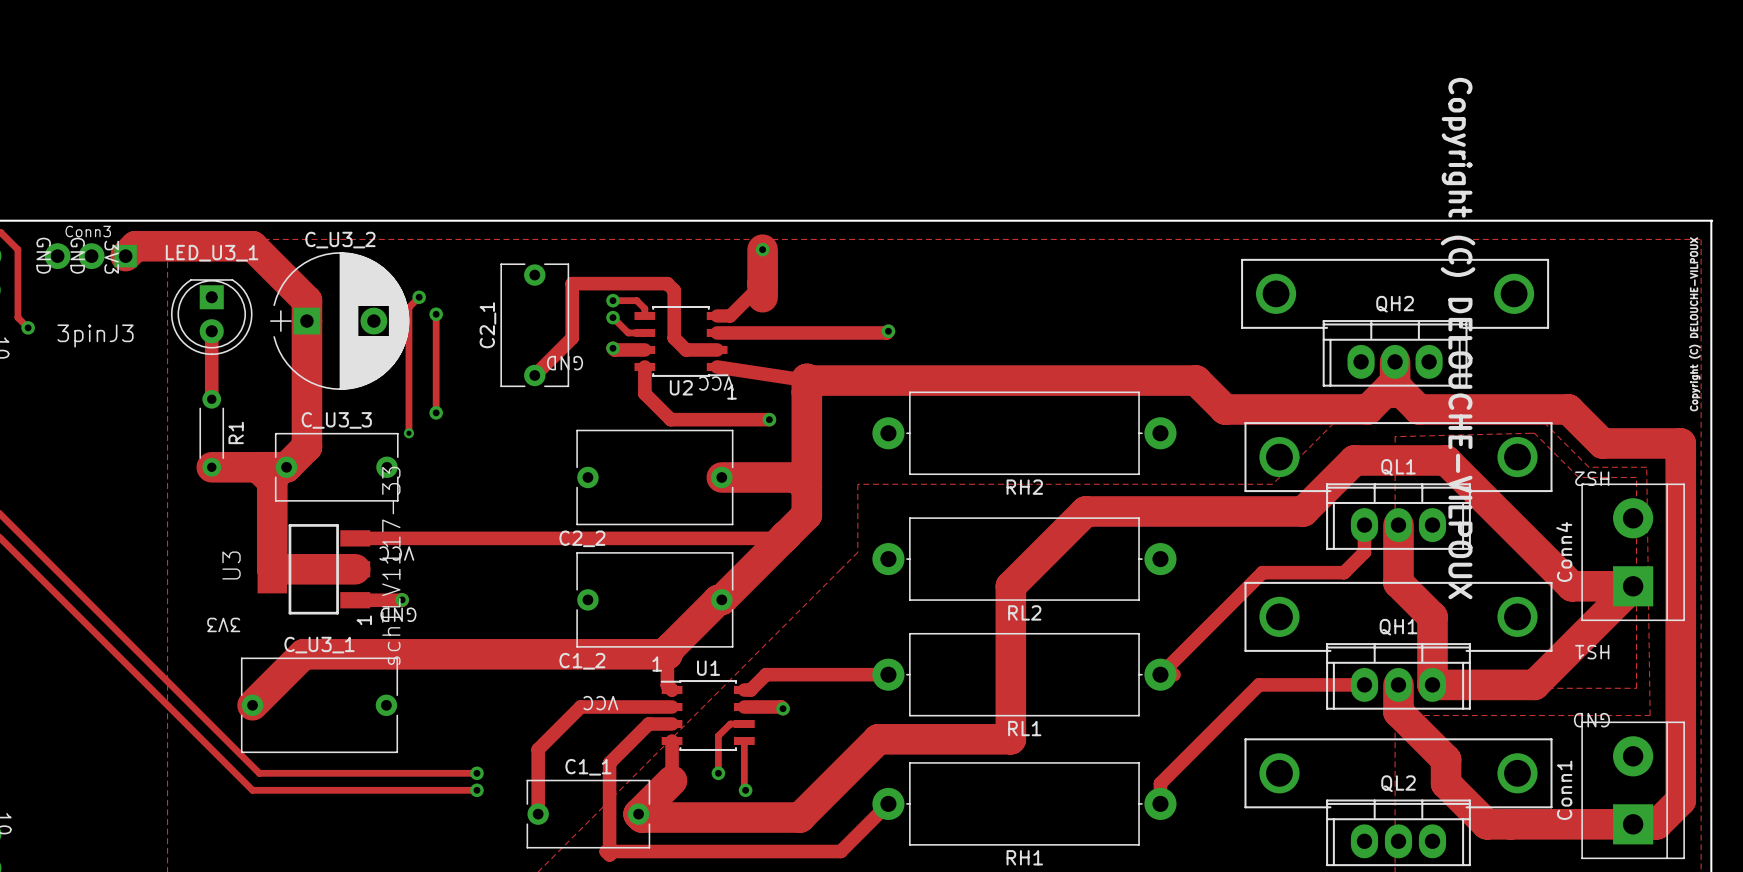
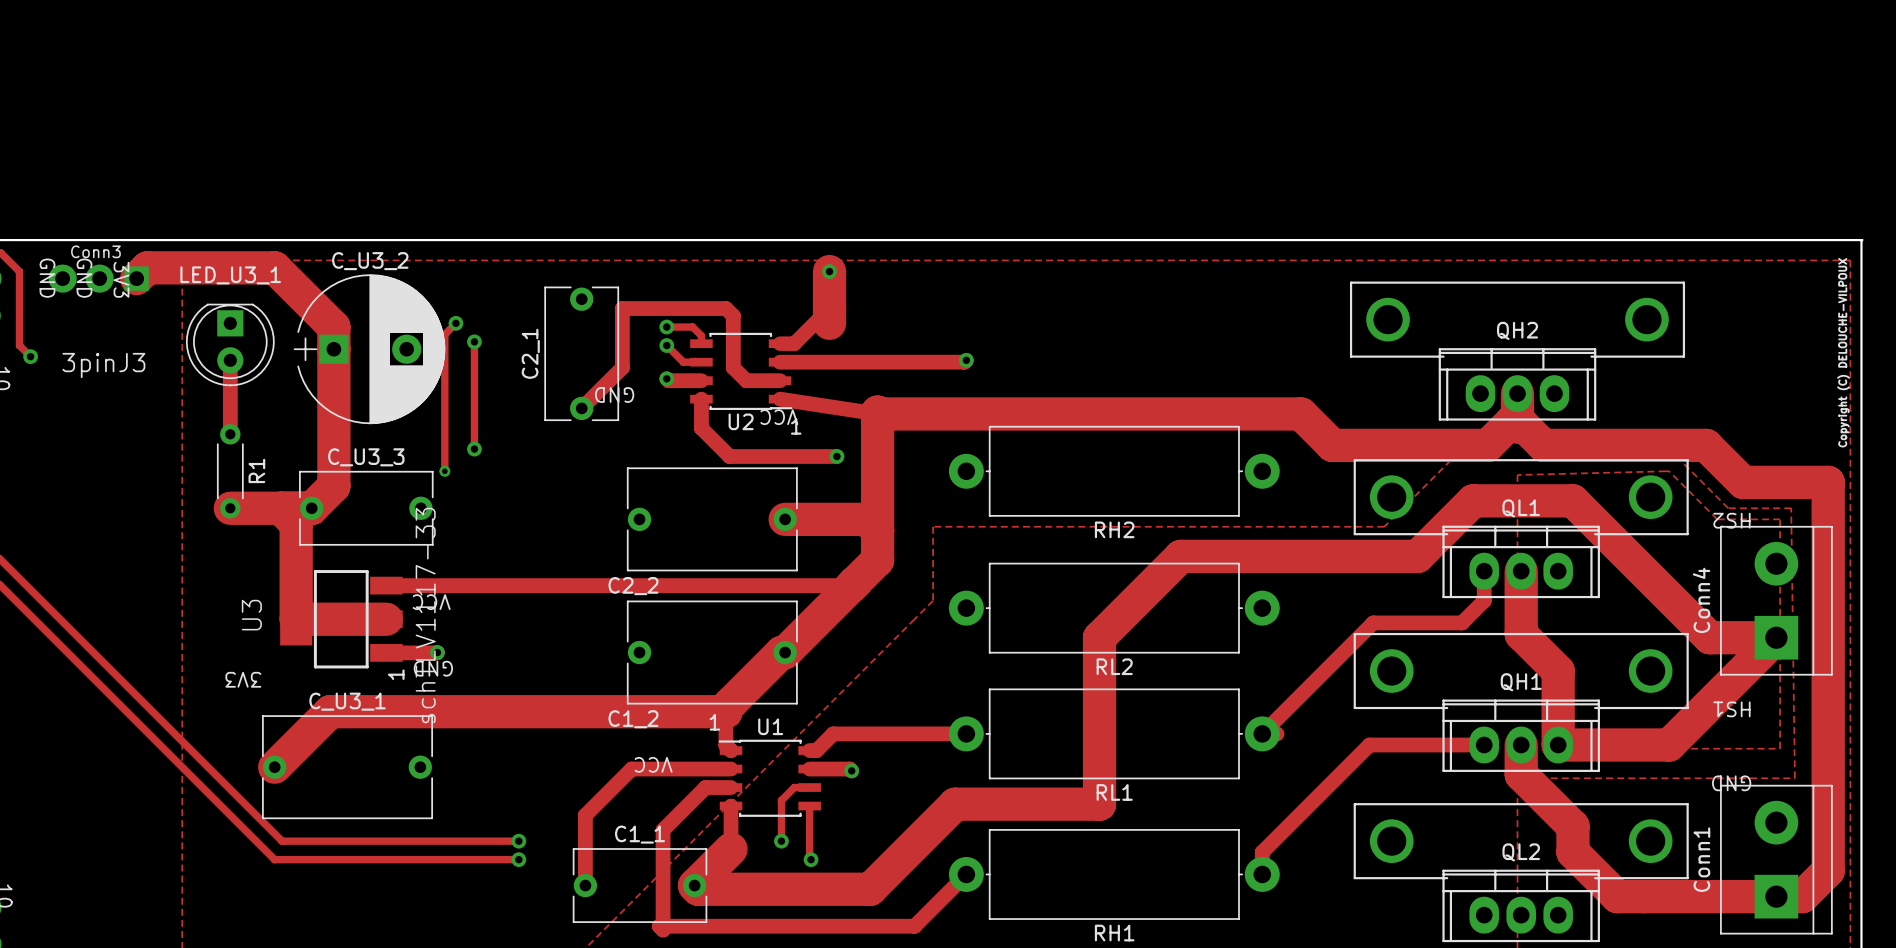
text: Copyright (C) DELOUCHE-VILPOUX (1458, 338) -> none

